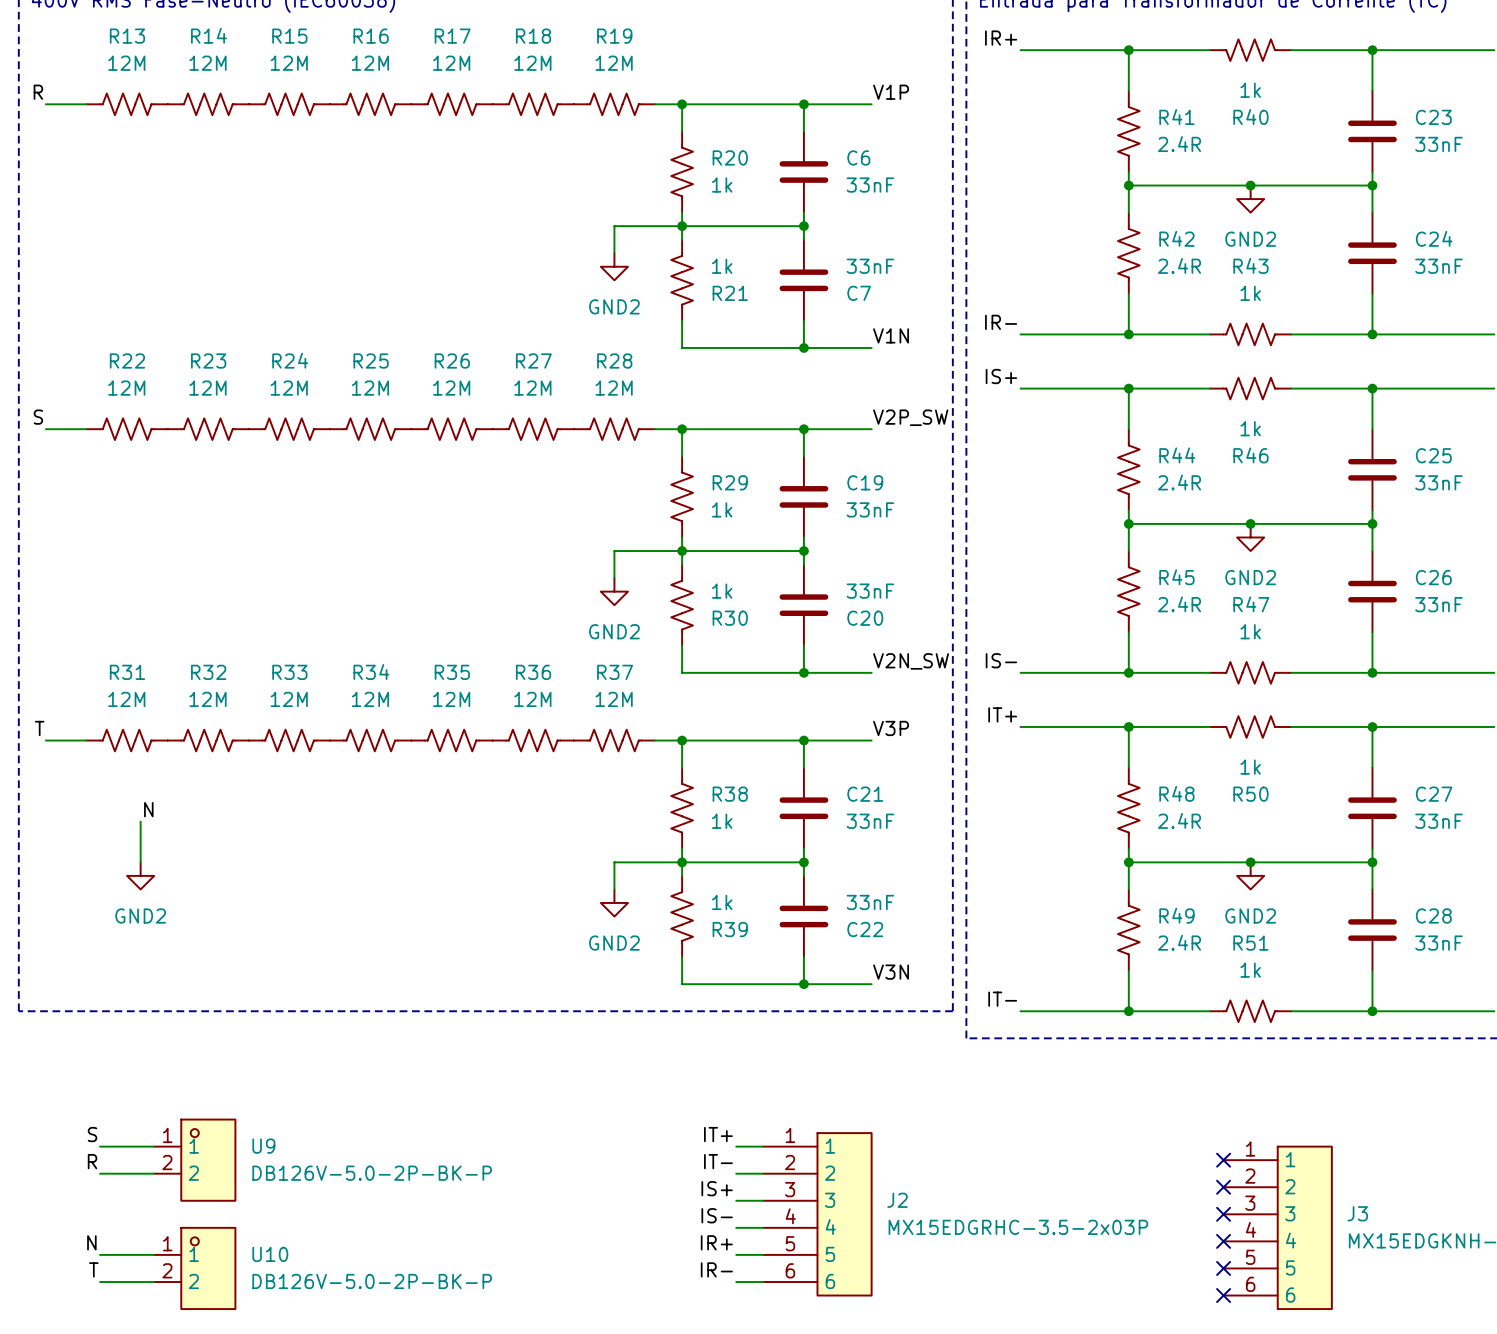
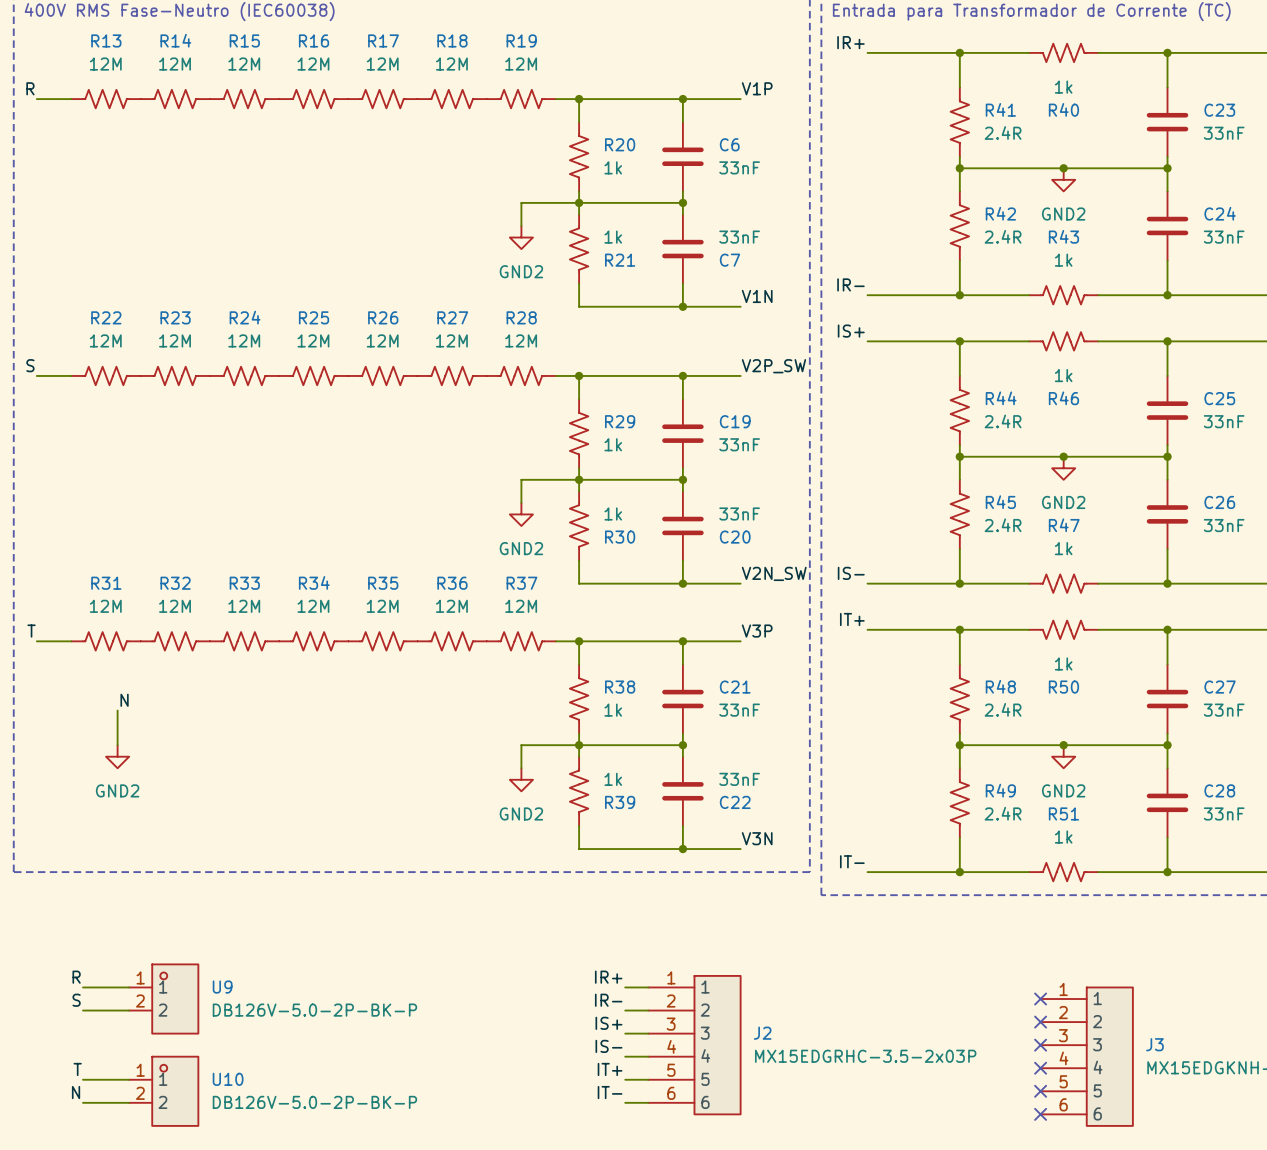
label: S (92, 1134) -> R (76, 977)
label: IT+ (718, 1134) -> IR+ (608, 977)
label: R (92, 1161) -> S (76, 1000)
label: IT- (718, 1161) -> IR- (608, 1000)
label: N (91, 1242) -> T (77, 1069)
label: IR+ (716, 1242) -> IT+ (610, 1069)
label: T (93, 1269) -> N (76, 1092)
label: IR- (716, 1269) -> IT- (610, 1092)

